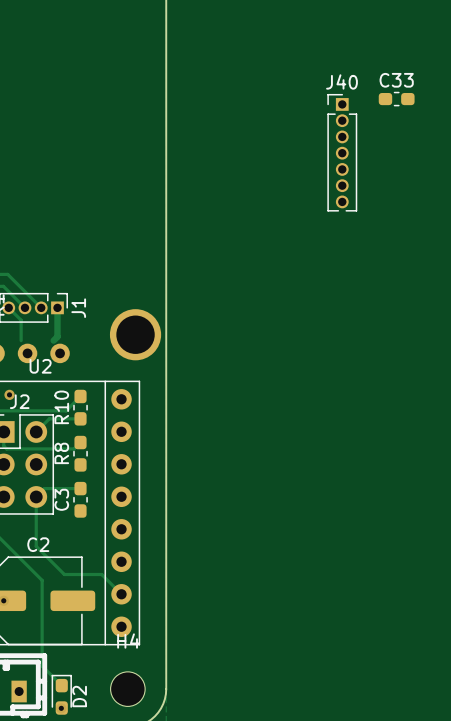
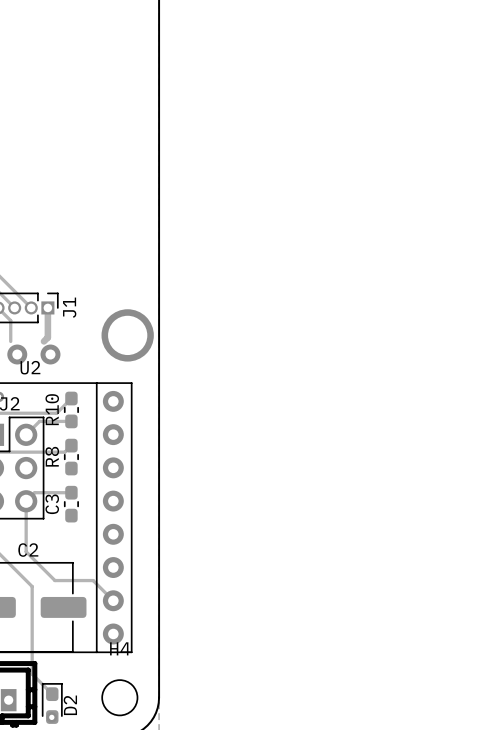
C33: (396, 99) -> none
J40: (342, 152) -> none

